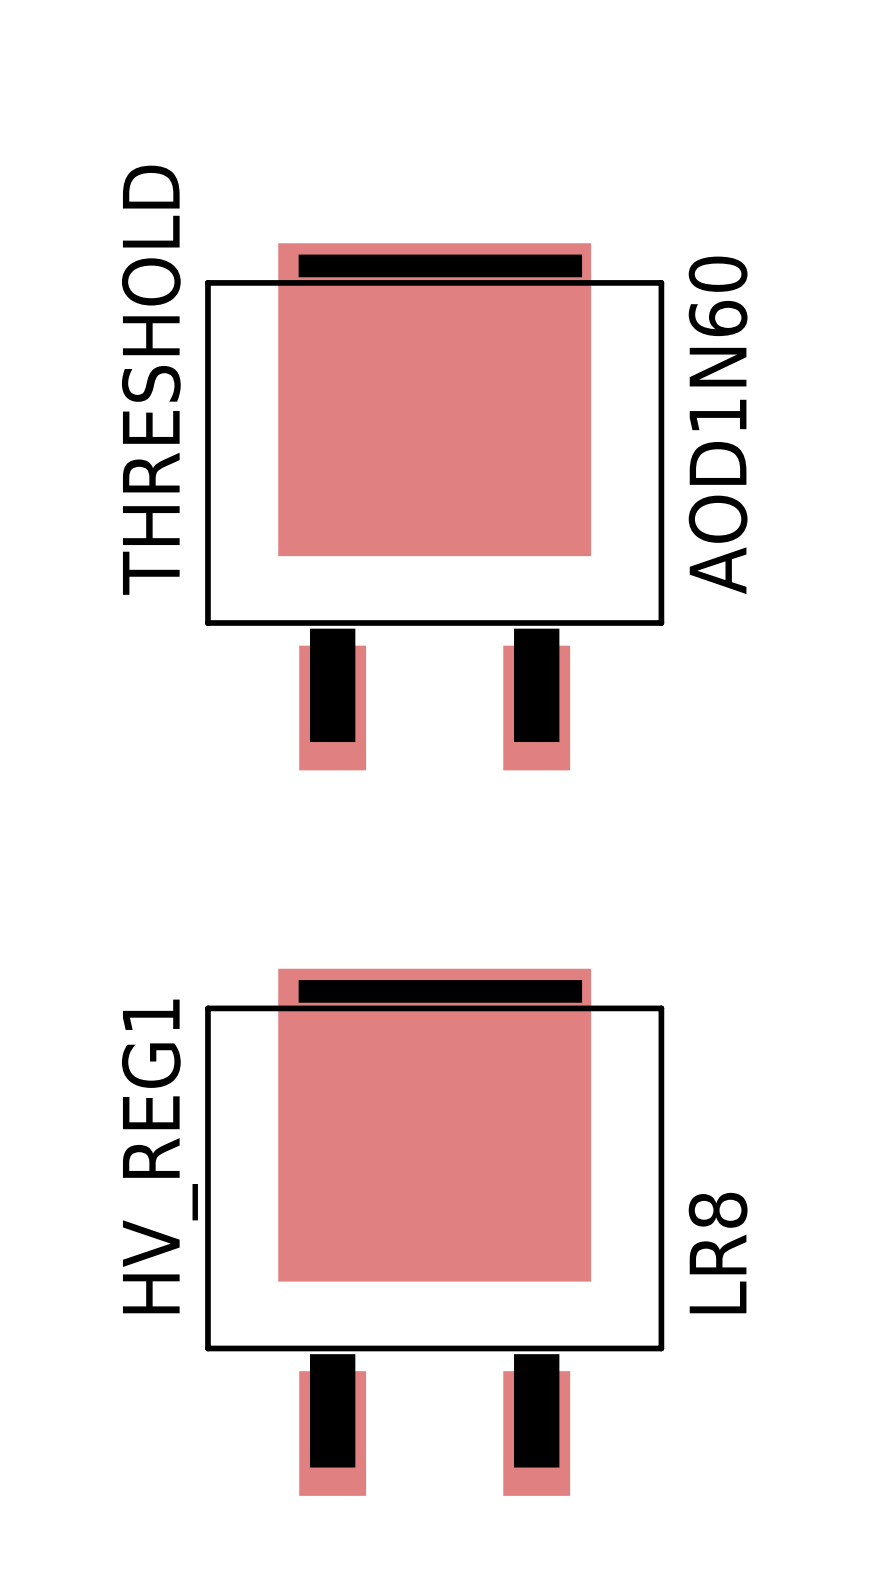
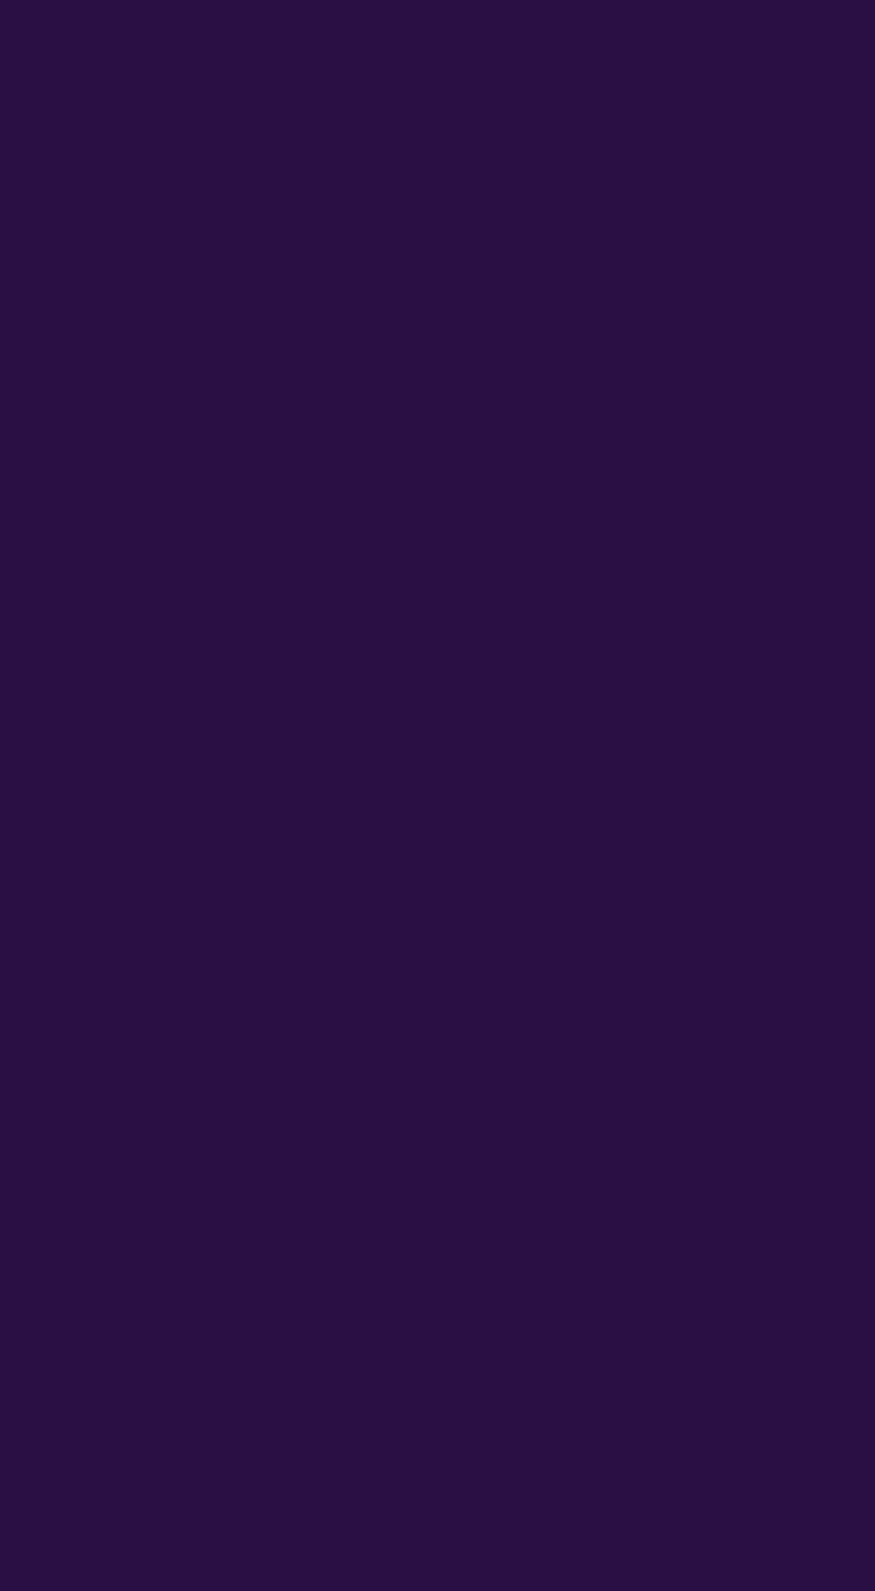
THRESHOLD: AOD1N60 (434, 506) -> none
HV_REG1: LR8 (434, 1232) -> none

